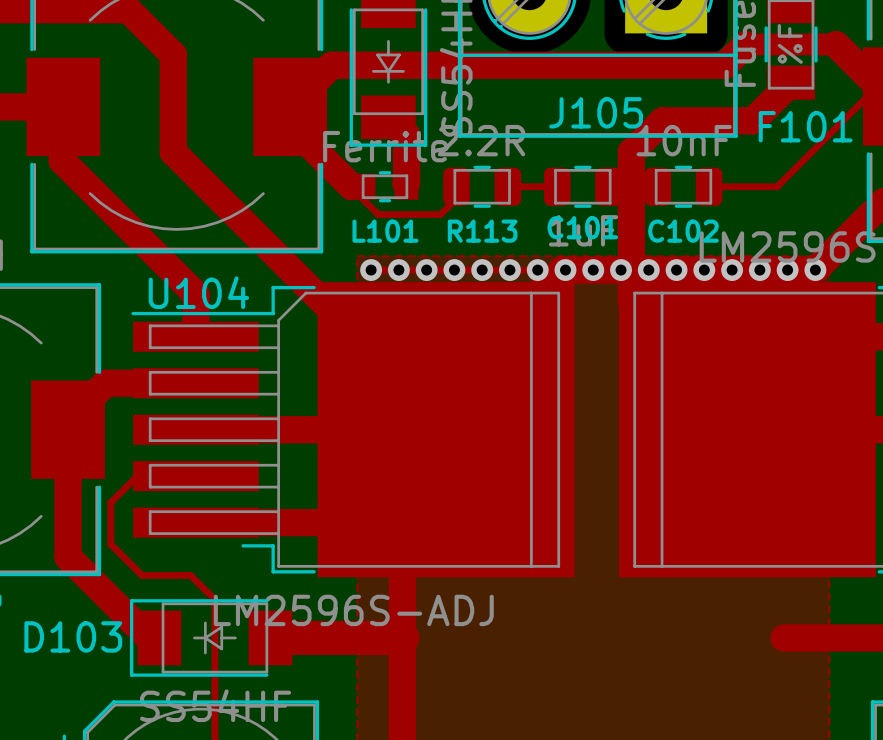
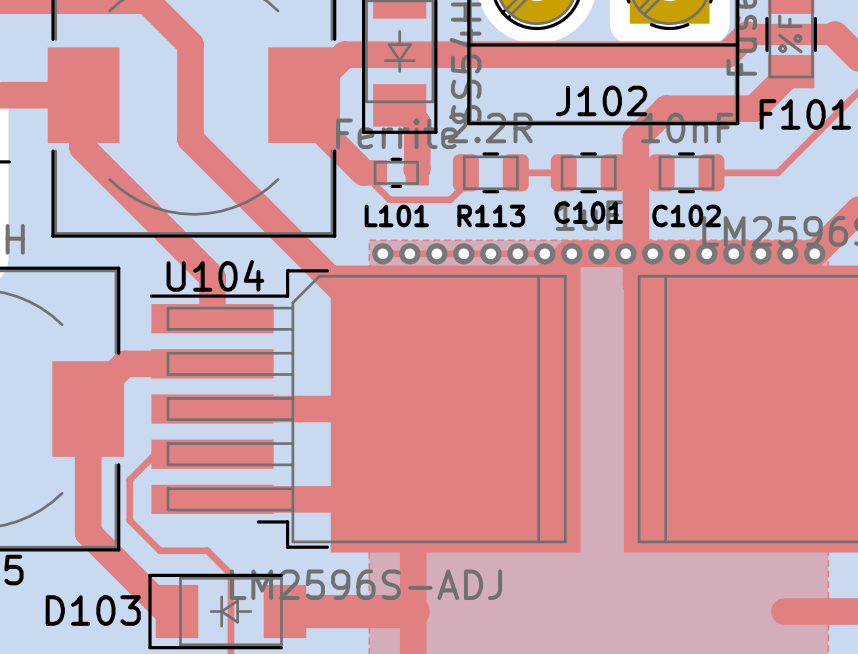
J105 name: J105 (596, 112) -> J102 (601, 100)

